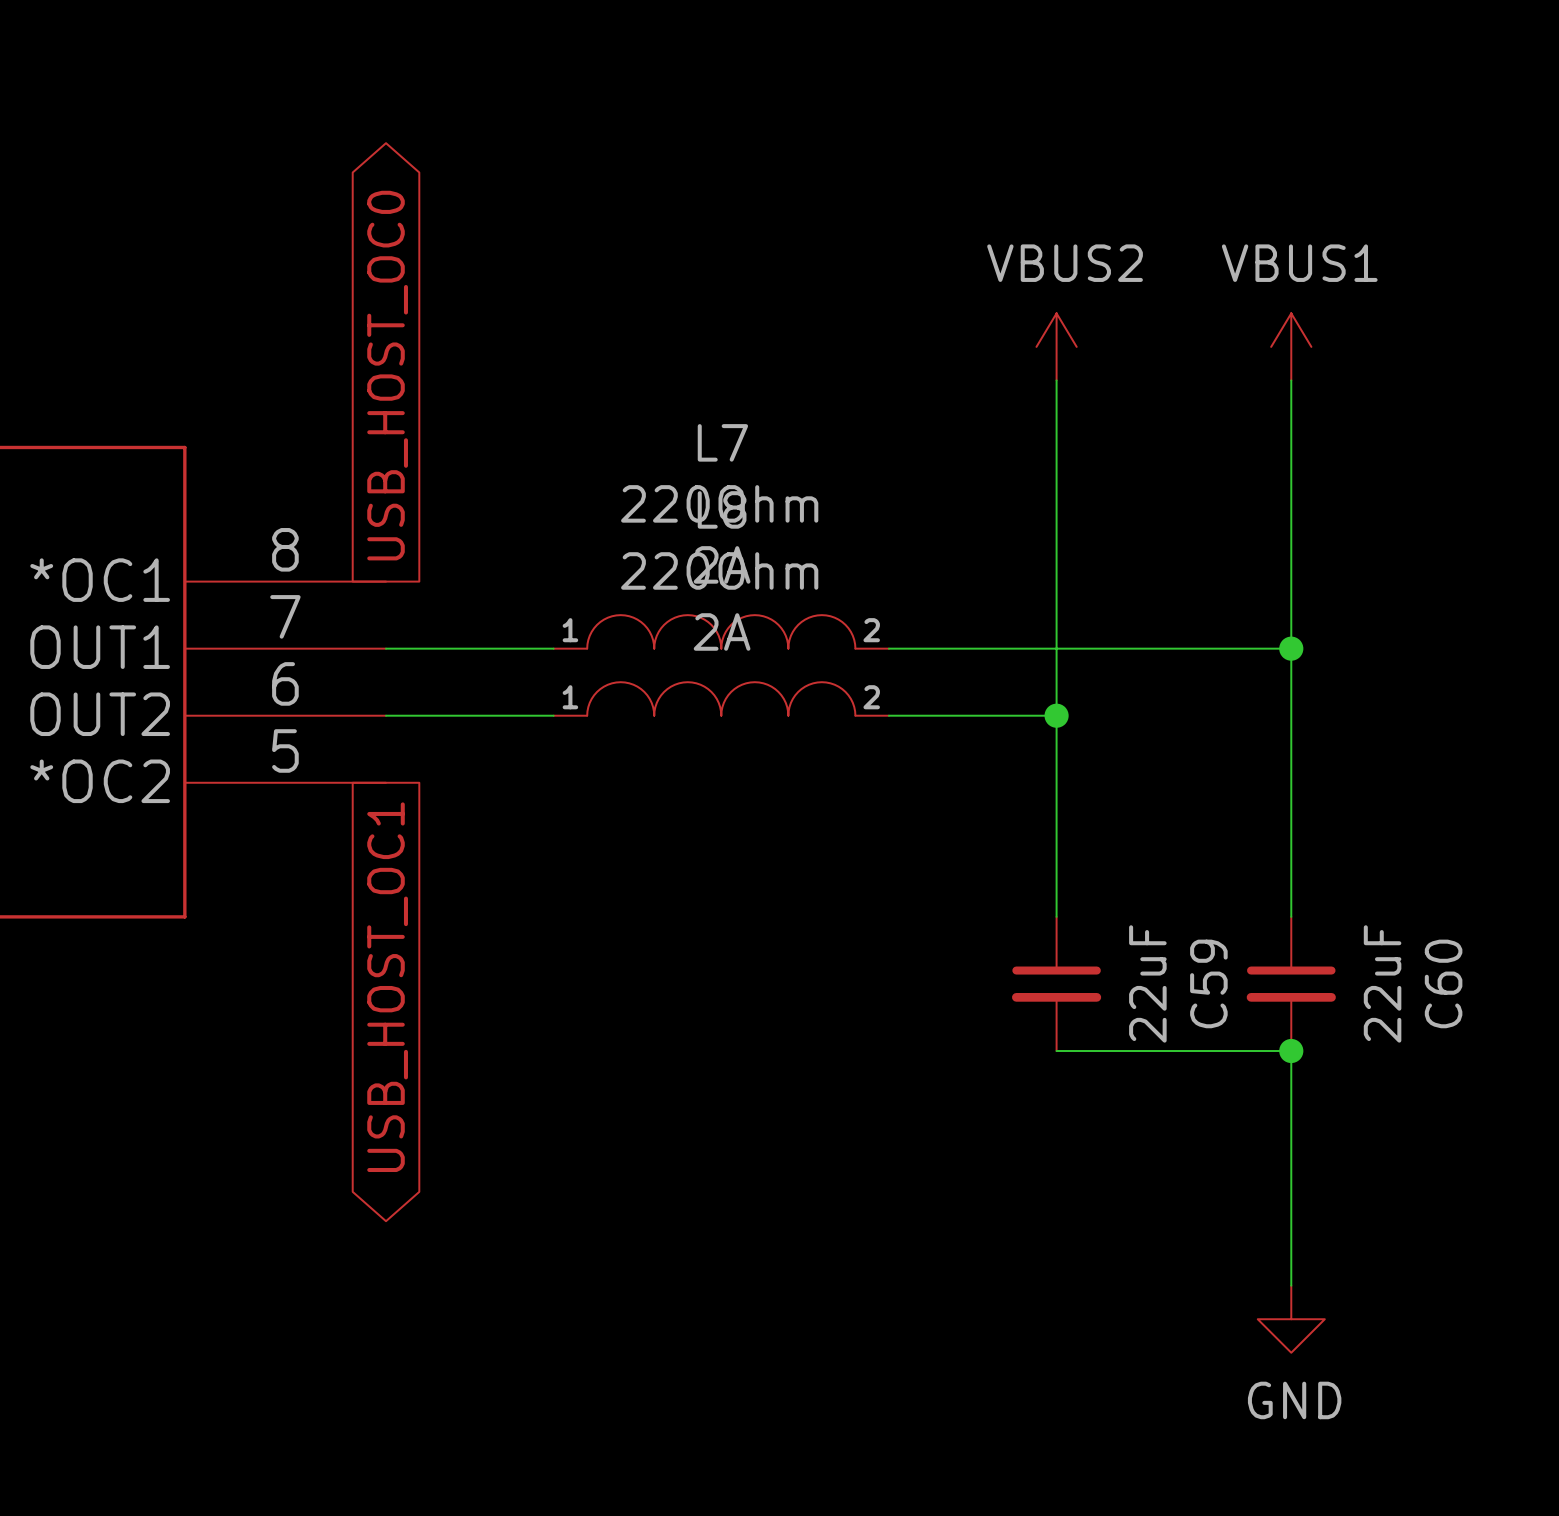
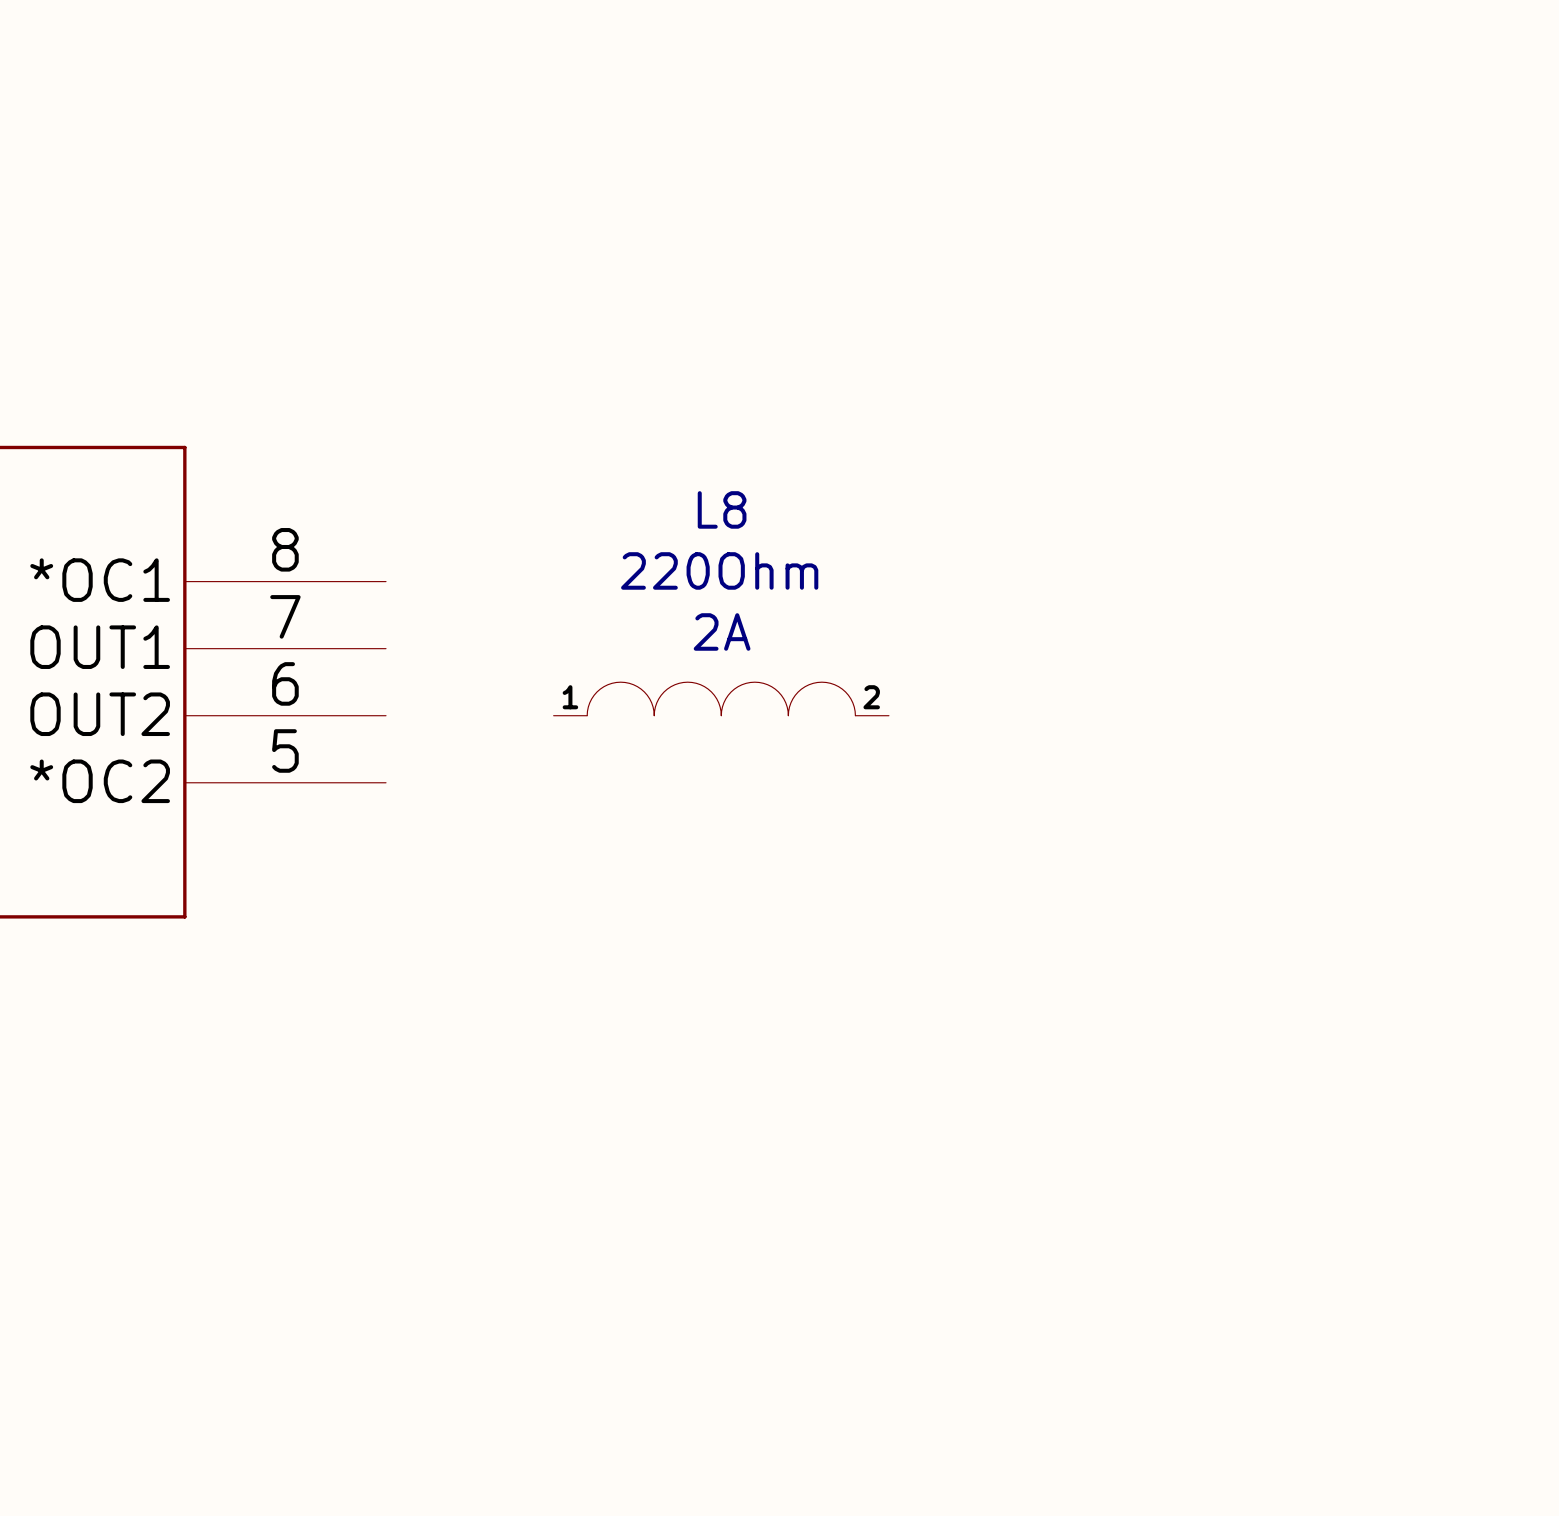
power symbol: VBUS2 (1056, 346) -> none
power symbol: VBUS1 (1291, 346) -> none
global label: USB_HOST_OC0 (387, 375) -> none
wire: (1056, 380) (1056, 916) -> none
wire: (1291, 380) (1291, 916) -> none
L7: 220Ohm (721, 631) -> none
wire: (386, 648) (553, 648) -> none
wire: (888, 648) (1291, 648) -> none
junction: (1291, 648) -> none
wire: (386, 715) (553, 715) -> none
wire: (888, 715) (1056, 715) -> none
junction: (1056, 715) -> none
C59: 22uF (1056, 983) -> none
C60: 22uF (1291, 983) -> none
global label: USB_HOST_OC1 (387, 987) -> none
wire: (1056, 1051) (1291, 1051) (1291, 1285) -> none
junction: (1291, 1051) -> none
power symbol: GND (1291, 1319) -> none

